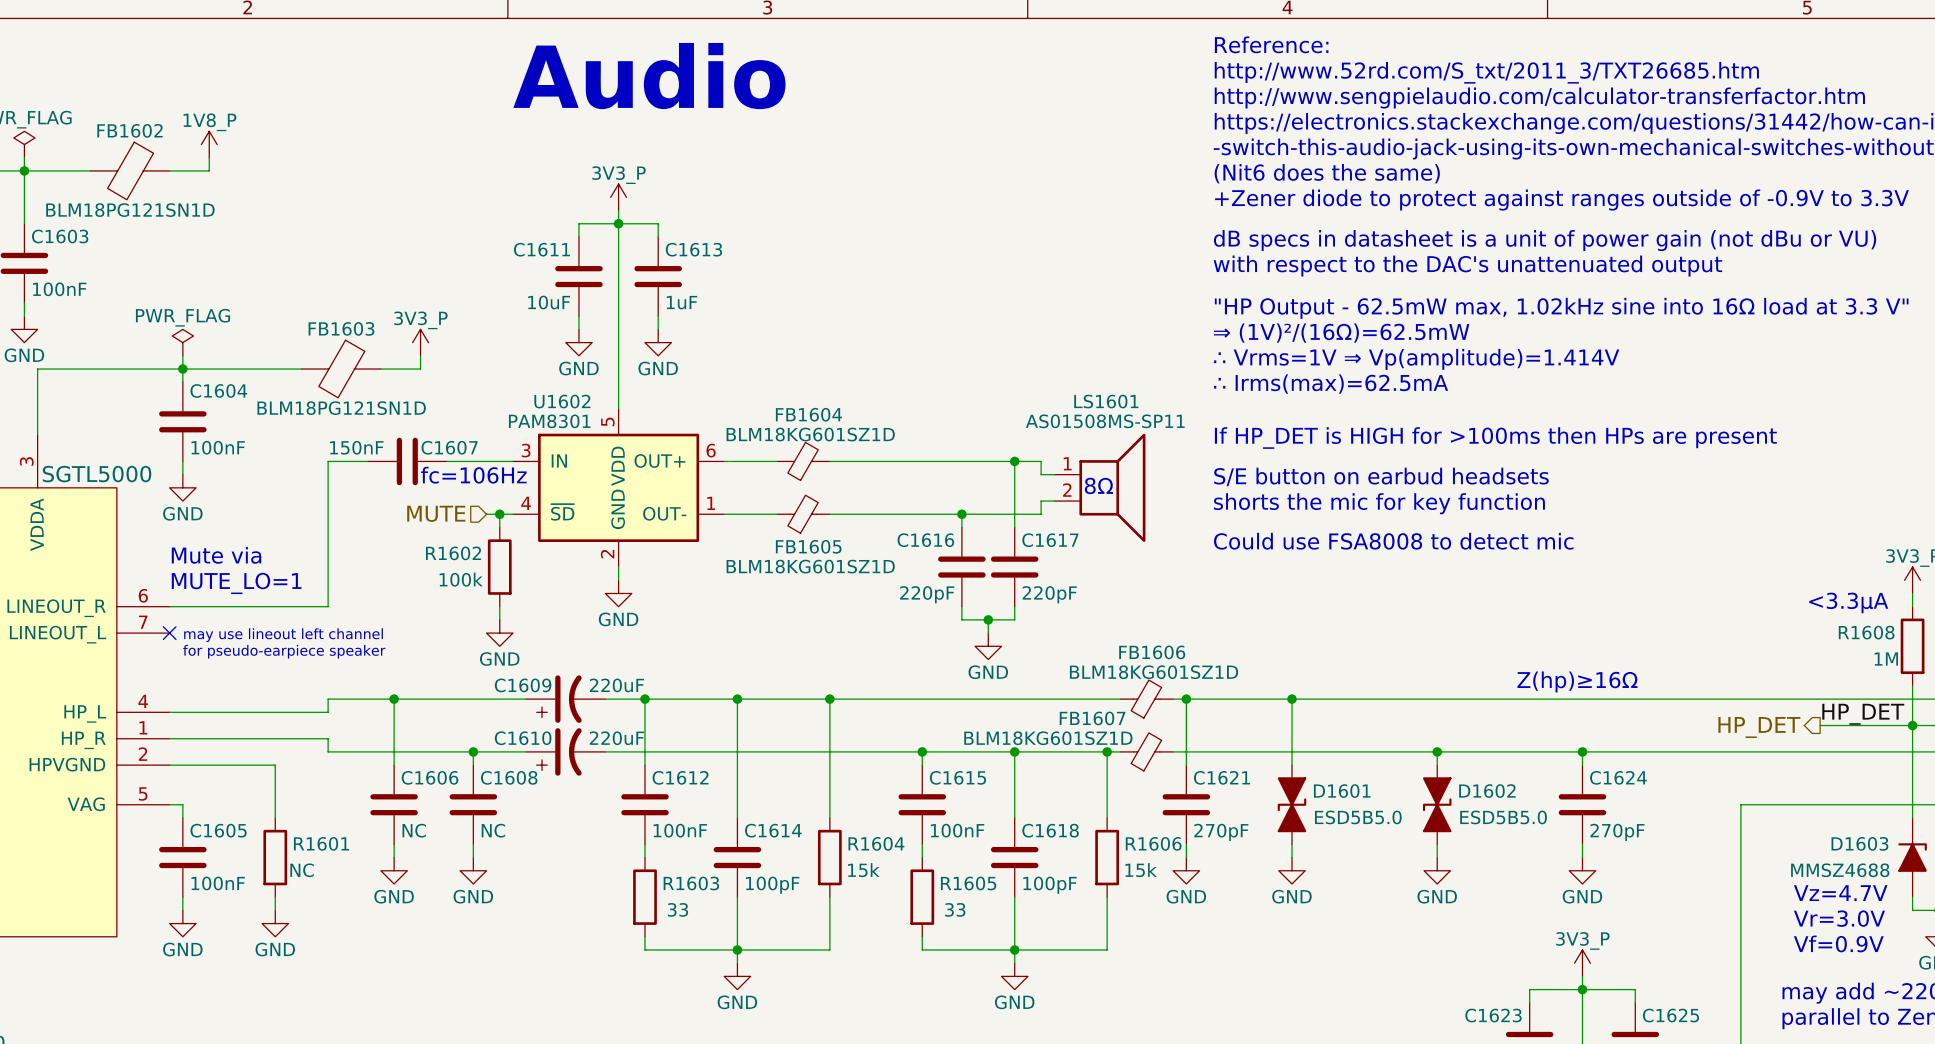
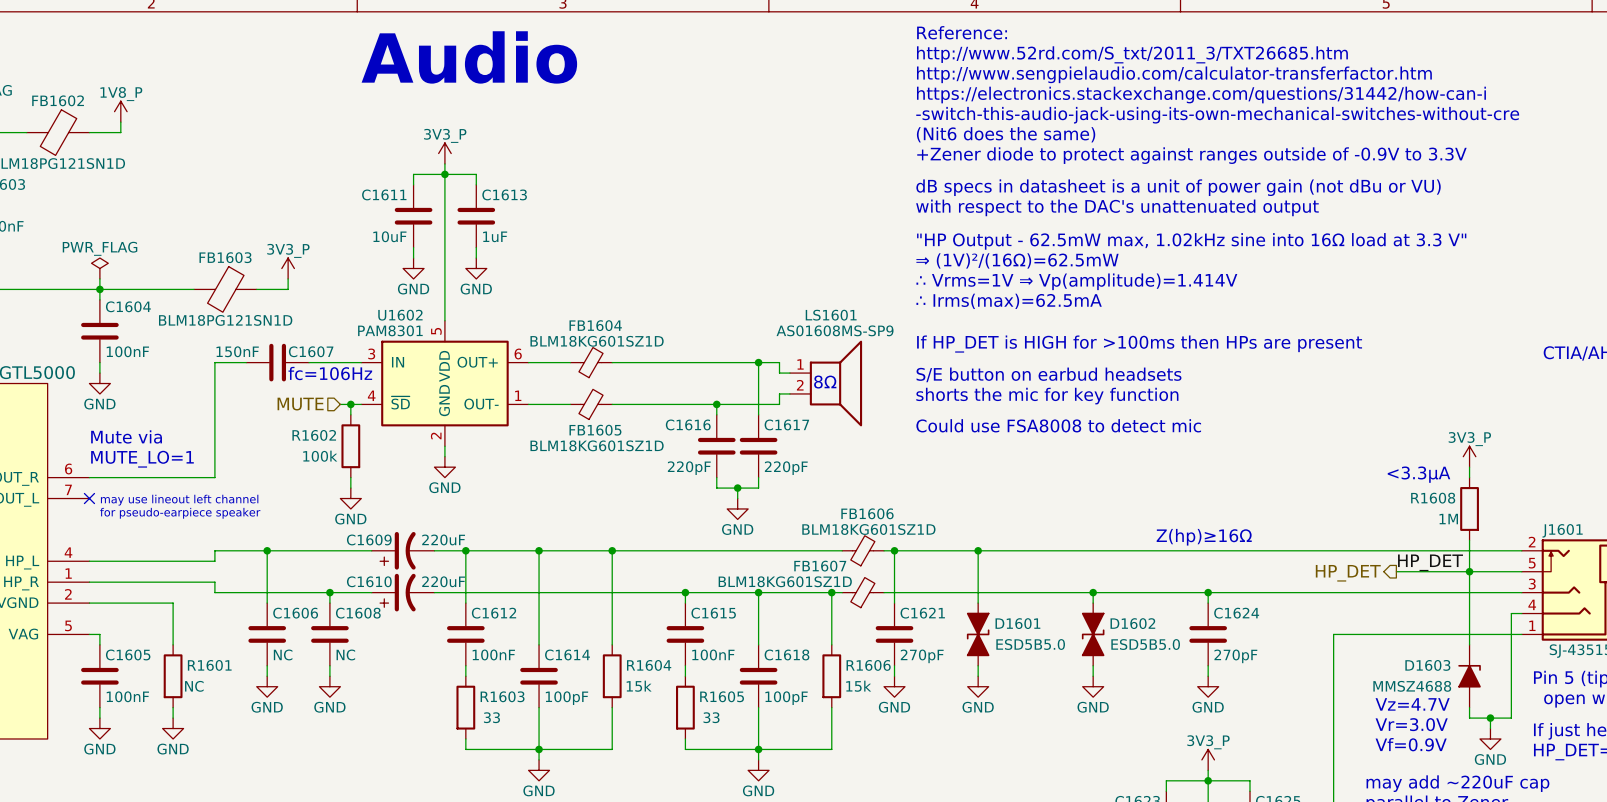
LS1601 value: AS01508MS-SP11 (1105, 421) -> AS01608MS-SP9 (835, 330)

